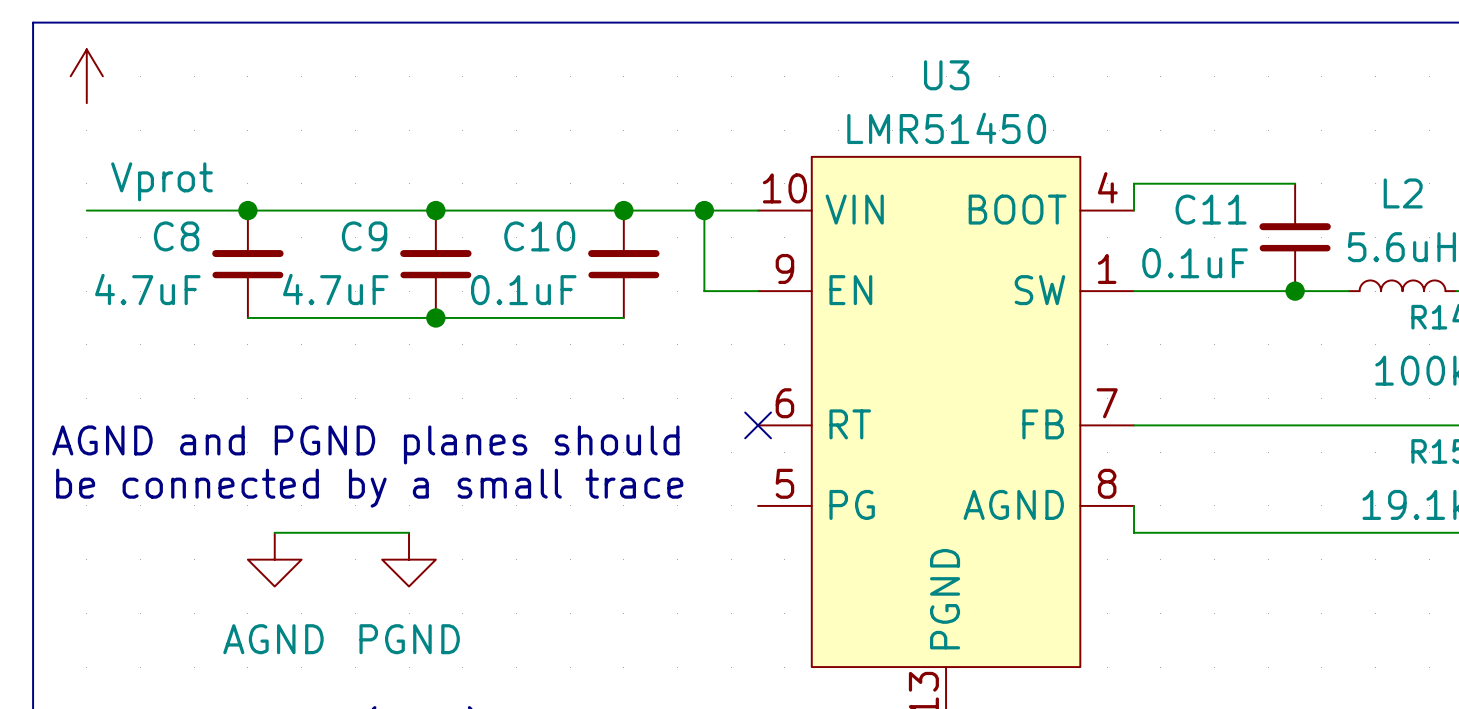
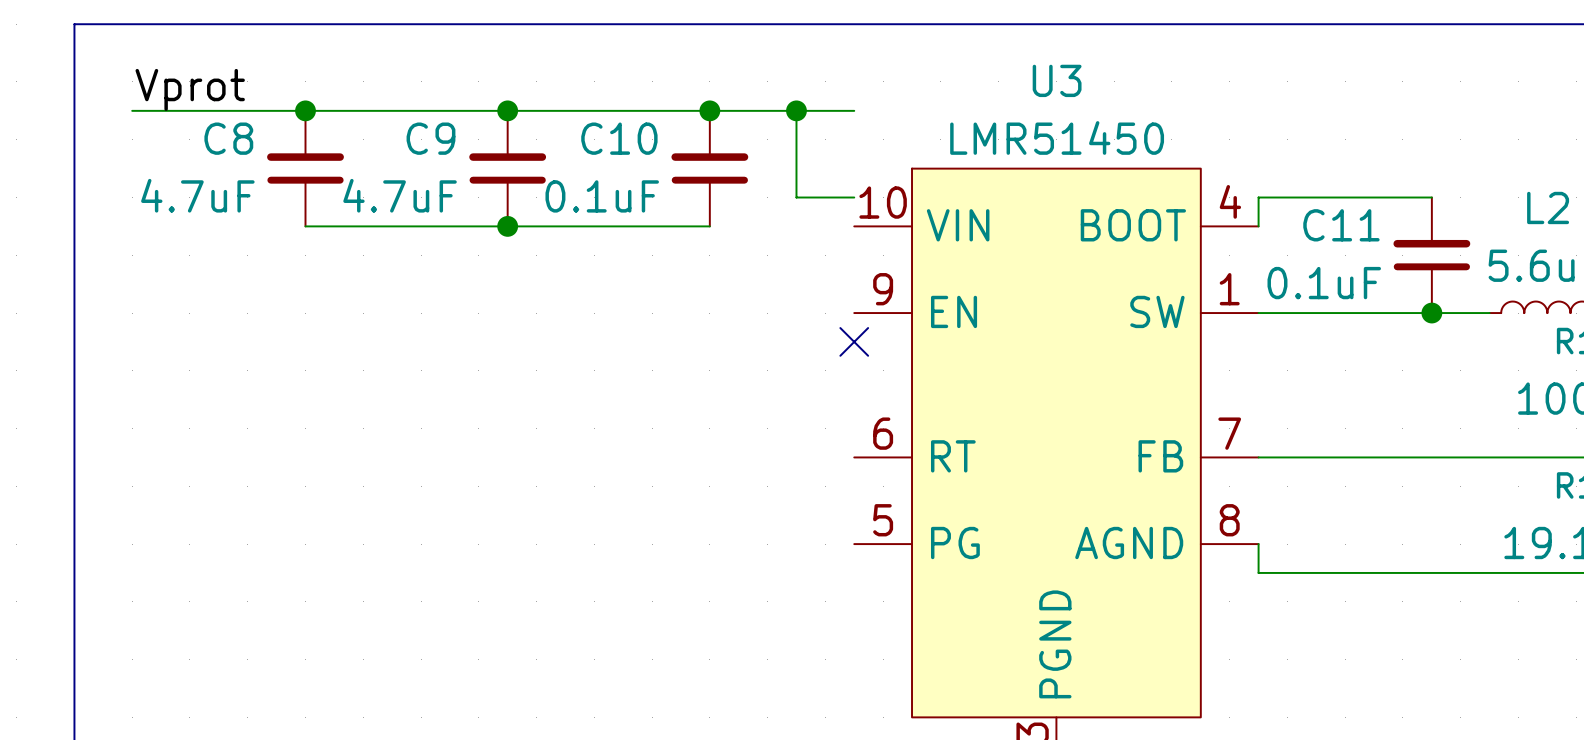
power symbol: Vprot (86, 76) -> none
label: none -> Vprot (190, 89)
wire: none -> (132, 110) (854, 110)
junction: none -> (507, 110)
junction: none -> (709, 110)
junction: none -> (796, 110)
wire: (86, 210) (247, 210) -> none
junction position: (247, 210) -> (305, 110)
wire: (623, 210) (758, 210) -> none
junction: (623, 210) -> none
wire: (704, 210) (704, 291) (758, 291) -> (796, 110) (796, 197) (854, 197)
junction: (704, 210) -> none
C8 position: (247, 264) -> (305, 168)
C9 position: (435, 264) -> (507, 168)
C10 position: (623, 264) -> (709, 168)
wire: (247, 317) (623, 317) -> none
junction: (435, 317) -> none
no-connect mark position: (758, 425) -> (854, 341)
text: AGND and PGND planes should (365, 444) -> none
text: be connected by a small trace (369, 488) -> none
wire: (274, 532) (409, 532) -> none
power symbol: AGND (274, 559) -> none
power symbol: PGND (409, 559) -> none

